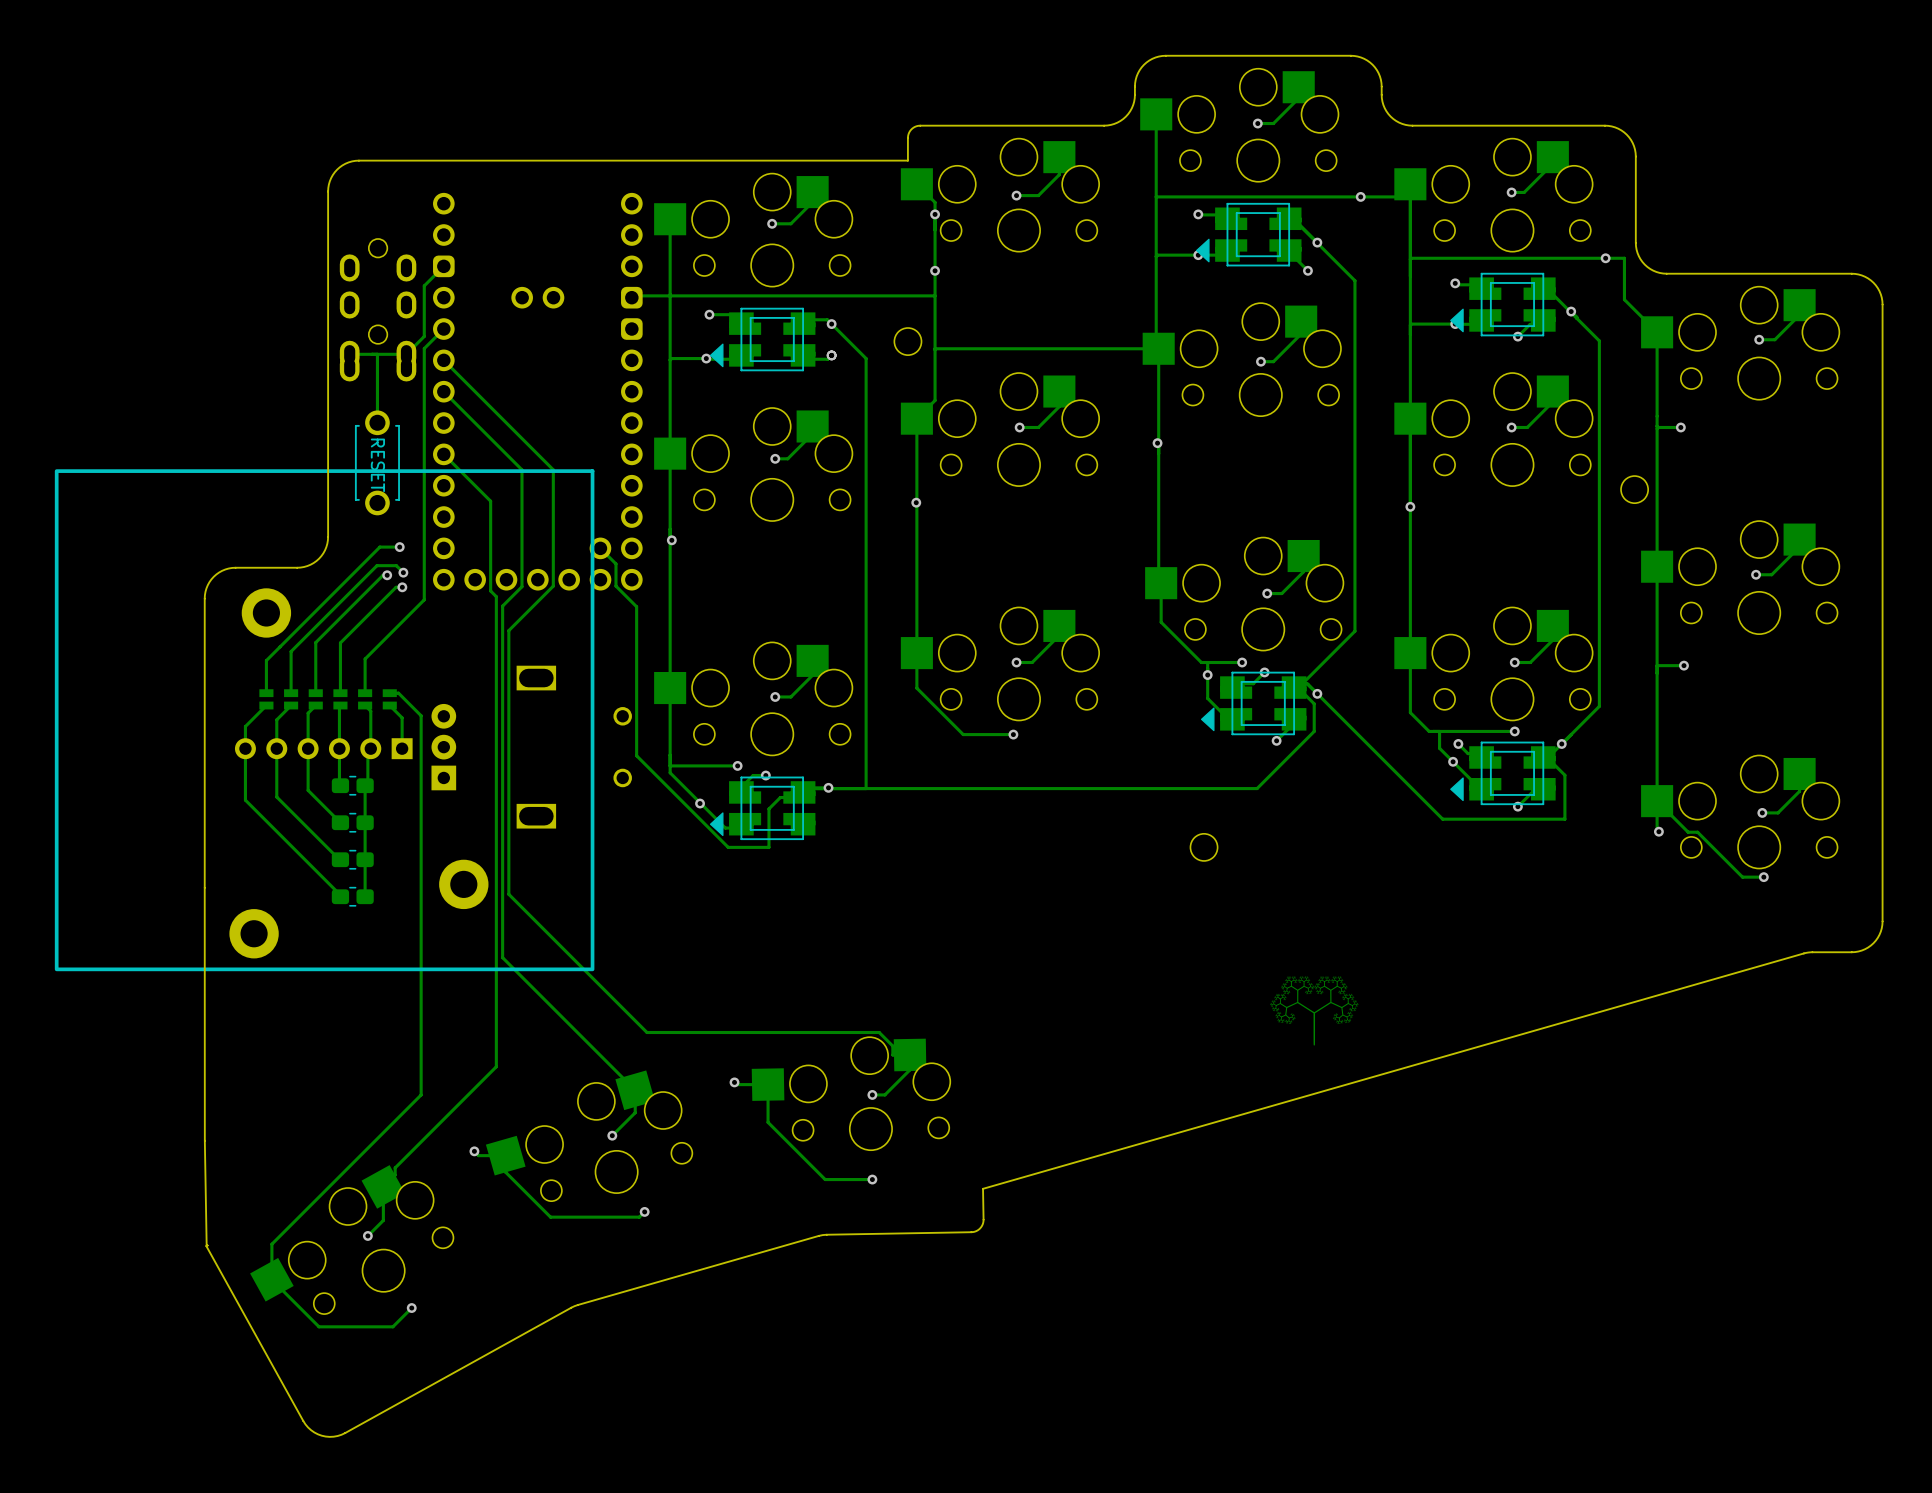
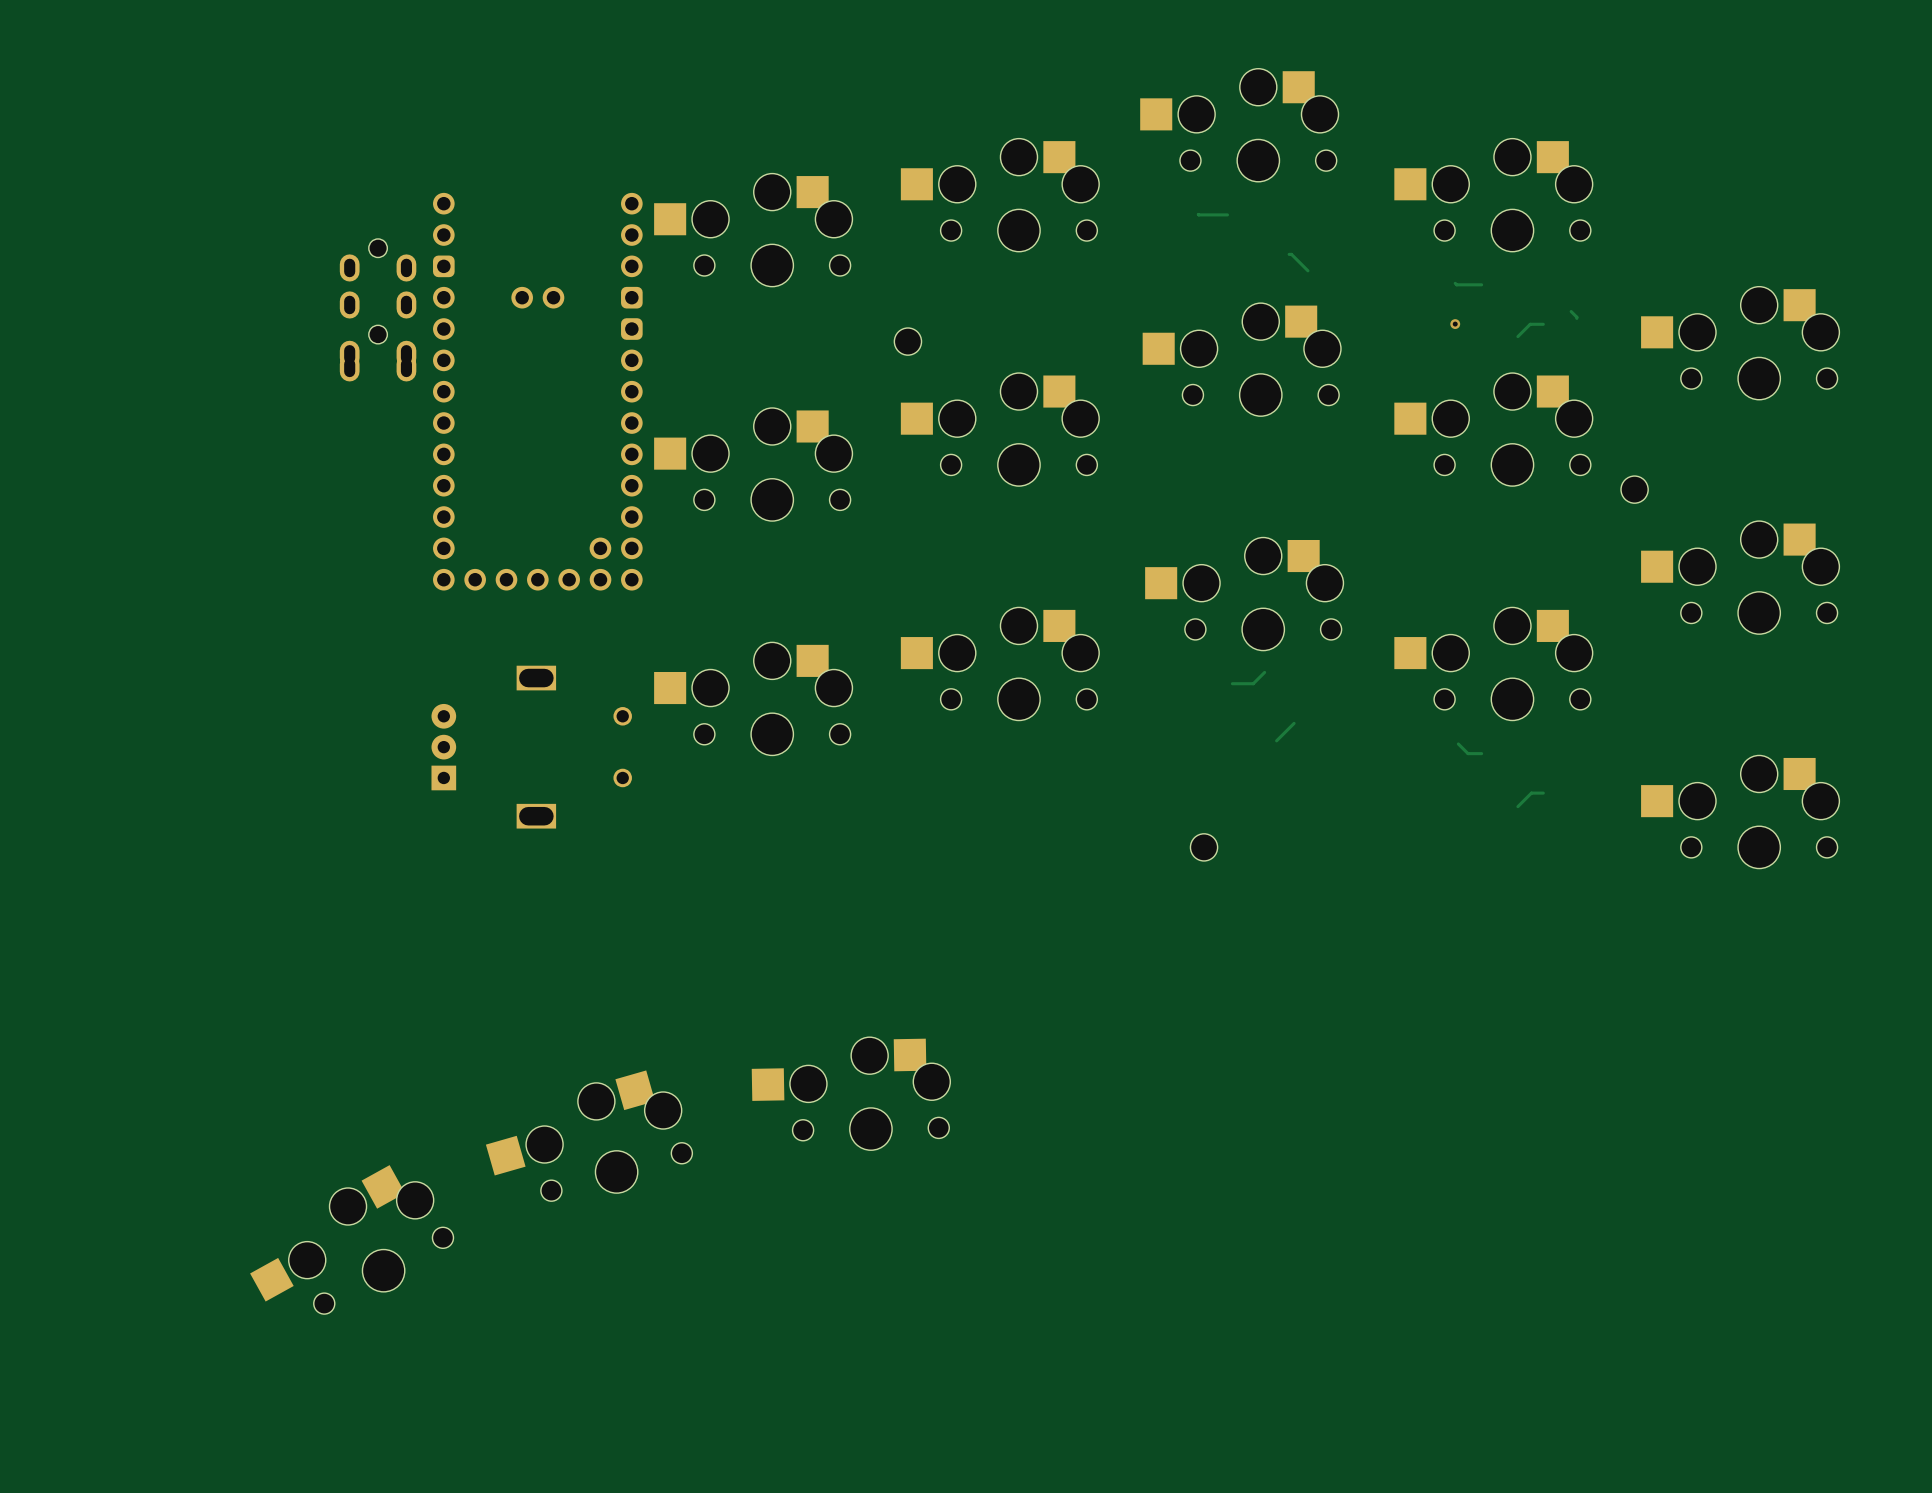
board edge: (1350, 55) (1158, 56) (1146, 62) (1139, 70) (1135, 79) (1134, 98) (1131, 108) (1125, 116) (1117, 122) (1104, 125) (917, 125) (911, 129) (908, 135) (907, 160) (358, 160) (345, 163) (334, 172) (329, 181) (328, 191) (328, 536) (326, 547) (319, 558) (304, 566) (235, 567) (222, 570) (209, 582) (204, 598) (206, 1246) (303, 1421) (311, 1430) (325, 1436) (341, 1434) (577, 1305) (822, 1235) (974, 1231) (980, 1228) (983, 1222) (983, 1188) (1803, 953) (1858, 951) (1868, 947) (1875, 940) (1880, 931) (1882, 921) (1882, 304) (1877, 288) (1868, 278) (1855, 273) (1666, 273) (1653, 270) (1642, 262) (1636, 249) (1635, 153) (1631, 140) (1624, 132) (1615, 127) (1604, 125) (1405, 124) (1393, 118) (1384, 108) (1381, 98) (1380, 79) (1374, 67) (1364, 58) (1350, 55) -> none
track: (1298, 87) (1298, 98) (1273, 123) (1257, 123) -> none
track: (1156, 114) (1156, 346) (1158, 348) -> none
via: (1257, 123) -> none
track: (1059, 157) (1059, 174) (1038, 195) (1016, 195) -> none
track: (1552, 157) (1552, 163) (1524, 192) (1511, 192) -> none
track: (916, 184) (935, 202) (935, 400) (916, 418) (916, 688) (963, 734) (1013, 734) -> none
track: (1410, 184) (1410, 712) (1429, 731) (1514, 731) -> none
track: (812, 192) (812, 202) (790, 223) (772, 223) -> none
via: (1511, 192) -> none
via: (1016, 195) -> none
via: (1360, 196) -> none
track: (1410, 196) (1156, 196) -> none
via: (935, 214) -> none
via: (1198, 214) -> none
track: (1289, 214) (1354, 280) (1354, 631) (1293, 692) (1290, 692) -> none
track: (670, 219) (670, 772) (725, 828) (741, 828) -> none
via: (772, 223) -> none
part: (1248, 234) -> none
via: (1317, 242) -> none
track: (1227, 254) (1156, 256) -> none
via: (1198, 255) -> none
via: (1605, 258) -> none
track: (1410, 259) (1624, 258) (1624, 299) (1657, 332) (1657, 829) (1658, 831) -> none
track: (443, 266) (424, 285) (424, 336) (406, 354) -> none
via: (935, 270) -> none
via: (1307, 270) -> none
via: (1455, 283) -> none
track: (1543, 284) (1599, 340) (1599, 706) (1552, 753) (1543, 753) (1564, 775) (1564, 819) (1442, 819) (1307, 683) (1294, 683) (1314, 703) (1314, 731) (1257, 788) (803, 788) (828, 787) -> none
track: (670, 295) (633, 295) (631, 297) -> none
track: (935, 295) (671, 295) -> none
part: (1502, 304) -> none
track: (1799, 305) (1799, 315) (1774, 339) (1759, 339) -> none
via: (1571, 311) -> none
track: (709, 314) (736, 314) (741, 319) -> none
via: (709, 314) -> none
track: (803, 319) (827, 319) (866, 358) (866, 788) -> none
track: (1301, 321) (1301, 333) (1273, 361) (1260, 361) -> none
via: (831, 324) -> none
track: (1481, 324) (1410, 325) -> none
track: (443, 329) (424, 348) (424, 599) (365, 659) (365, 693) -> none
via: (1517, 336) -> none
part: (762, 339) -> none
via: (1759, 339) -> none
track: (1158, 348) (1158, 580) (1161, 583) (1161, 622) (1201, 662) (1242, 662) -> none
track: (1158, 348) (935, 348) -> none
track: (377, 354) (377, 422) -> none
track: (406, 354) (349, 354) (349, 367) -> none
track: (831, 355) (827, 359) (803, 359) -> none
via: (831, 355) -> none
via: (706, 358) -> none
track: (741, 359) (670, 359) -> none
track: (443, 360) (553, 469) (553, 586) (508, 630) (508, 894) (647, 1032) (879, 1032) (892, 1046) (892, 1054) (910, 1054) (910, 1069) (884, 1094) (872, 1094) -> none
via: (1260, 361) -> none
track: (443, 391) (521, 469) (521, 586) (502, 606) (502, 957) (635, 1090) (635, 1112) (612, 1135) -> none
track: (1059, 391) (1059, 406) (1038, 427) (1019, 427) -> none
track: (1552, 391) (1552, 401) (1527, 427) (1511, 427) -> none
track: (812, 426) (812, 433) (787, 458) (775, 458) -> none
via: (1019, 427) -> none
via: (1511, 427) -> none
track: (1680, 427) (1658, 427) -> none
via: (1680, 427) -> none
via: (1157, 443) -> none
track: (443, 454) (490, 501) (490, 590) (496, 596) (496, 1066) (395, 1167) (395, 1175) (383, 1186) (383, 1220) (367, 1235) -> none
via: (775, 458) -> none
part: (377, 462) -> none
drawing: [54, 469, 595, 972] -> none
via: (916, 502) -> none
via: (1410, 506) -> none
track: (1799, 539) (1799, 546) (1771, 574) (1756, 574) -> none
via: (671, 540) -> none
track: (399, 547) (379, 547) (266, 660) (266, 693) -> none
via: (399, 547) -> none
track: (600, 548) (615, 563) (615, 586) (636, 606) (636, 755) (728, 847) (768, 847) (768, 808) (780, 797) (799, 797) -> none
track: (1303, 556) (1303, 571) (1281, 593) (1267, 593) -> none
track: (403, 572) (396, 565) (376, 565) (291, 651) (291, 693) -> none
via: (403, 572) -> none
via: (1756, 574) -> none
track: (387, 575) (383, 575) (315, 642) (315, 693) -> none
via: (387, 575) -> none
track: (402, 587) (396, 587) (340, 642) (340, 693) -> none
via: (402, 587) -> none
via: (1267, 593) -> none
part: (266, 612) -> none
track: (1059, 625) (1059, 635) (1032, 662) (1016, 662) -> none
track: (1552, 625) (1552, 640) (1530, 662) (1514, 662) -> none
track: (812, 660) (812, 675) (790, 696) (775, 696) -> none
via: (1016, 662) -> none
track: (1207, 662) (1207, 698) (1232, 723) -> none
via: (1242, 662) -> none
via: (1514, 662) -> none
track: (1683, 665) (1657, 665) -> none
via: (1683, 665) -> none
via: (1264, 672) -> none
via: (1207, 675) -> none
track: (389, 693) (398, 693) (421, 715) (421, 1094) (271, 1244) (271, 1279) (319, 1326) (392, 1326) (411, 1308) -> none
via: (1317, 693) -> none
via: (775, 696) -> none
part: (266, 699) -> none
part: (291, 699) -> none
part: (315, 699) -> none
part: (340, 699) -> none
part: (365, 699) -> none
part: (389, 699) -> none
part: (1253, 703) -> none
track: (266, 705) (245, 726) (245, 800) (340, 896) -> none
track: (291, 705) (276, 719) (276, 797) (340, 859) -> none
track: (315, 705) (308, 713) (308, 790) (340, 822) -> none
track: (340, 705) (340, 785) -> none
track: (365, 705) (370, 711) (370, 748) (367, 751) (367, 782) (365, 785) (365, 896) -> none
track: (389, 705) (402, 717) (402, 748) -> none
track: (1439, 731) (1439, 748) (1475, 784) (1485, 784) -> none
via: (1514, 731) -> none
via: (1013, 734) -> none
via: (1276, 740) -> none
via: (1458, 743) -> none
via: (1561, 743) -> none
part: (323, 748) -> none
via: (1453, 761) -> none
track: (737, 765) (670, 765) -> none
via: (737, 765) -> none
part: (1502, 773) -> none
track: (1799, 773) (1799, 791) (1777, 812) (1762, 812) -> none
track: (765, 775) (753, 775) (741, 788) -> none
via: (765, 775) -> none
part: (352, 785) -> none
via: (828, 787) -> none
track: (1657, 801) (1688, 832) (1697, 832) (1742, 877) (1763, 877) -> none
via: (700, 803) -> none
via: (1517, 806) -> none
part: (762, 808) -> none
via: (1762, 812) -> none
part: (352, 822) -> none
via: (1658, 831) -> none
part: (352, 859) -> none
via: (1763, 877) -> none
part: (463, 884) -> none
part: (352, 896) -> none
part: (254, 933) -> none
drawing: [1270, 976, 1359, 1046] -> none
track: (734, 1082) (736, 1084) (768, 1084) (768, 1122) (825, 1179) (872, 1179) -> none
via: (734, 1082) -> none
via: (872, 1094) -> none
via: (612, 1135) -> none
track: (474, 1151) (478, 1155) (505, 1155) (505, 1172) (550, 1217) (639, 1217) (644, 1211) -> none
via: (474, 1151) -> none
via: (872, 1179) -> none
via: (644, 1211) -> none
via: (367, 1235) -> none
via: (411, 1308) -> none

